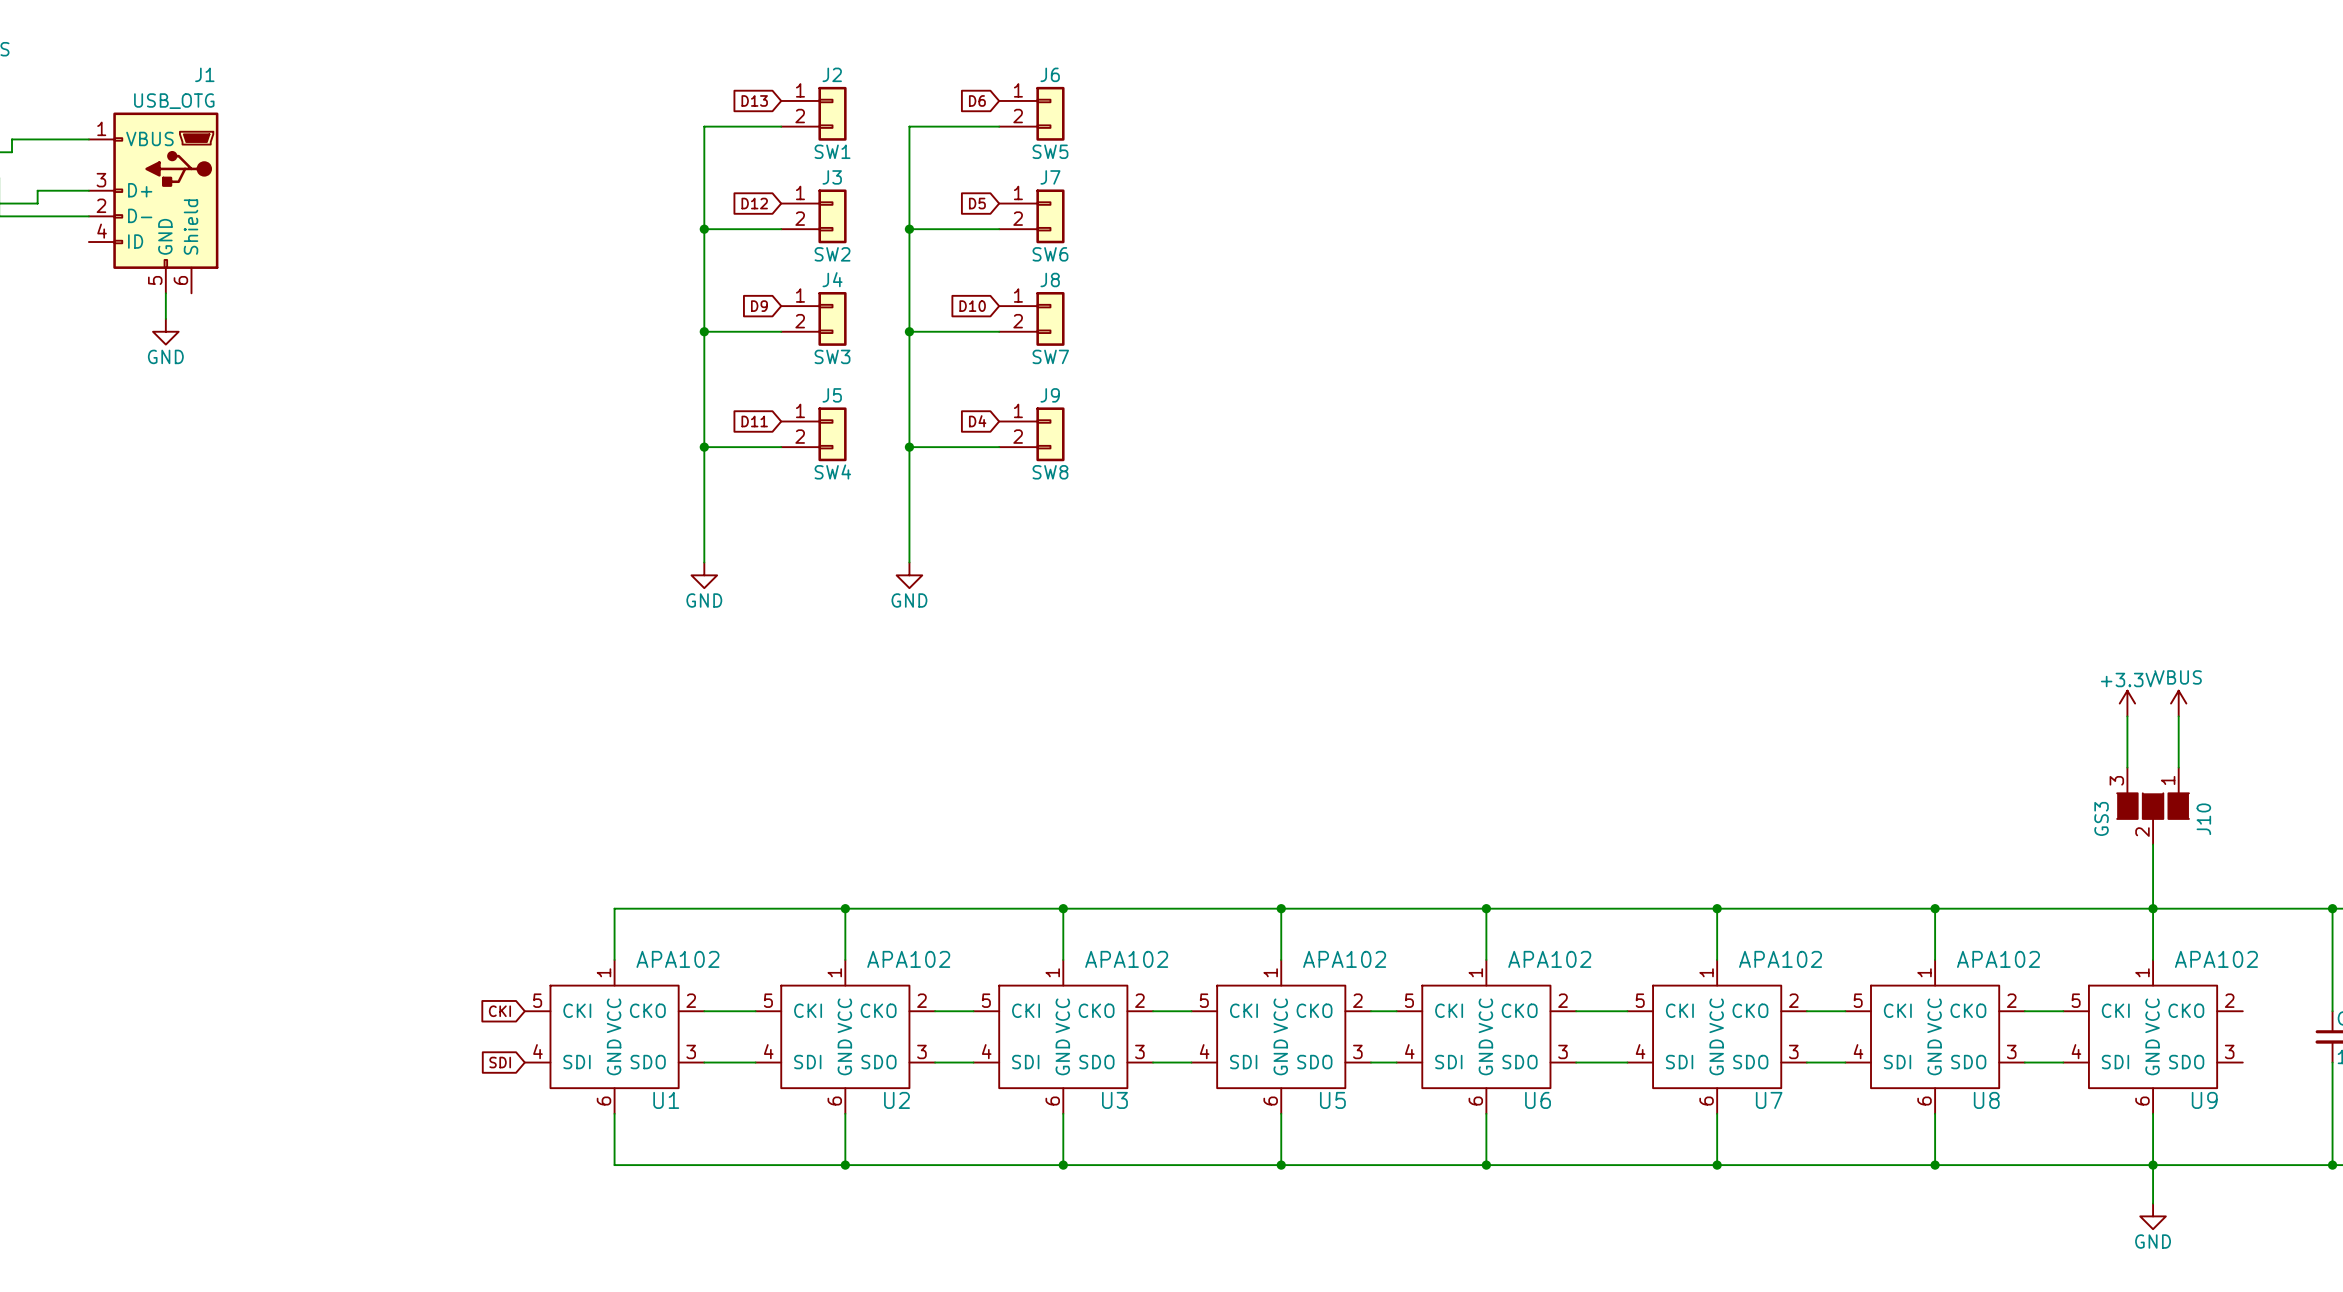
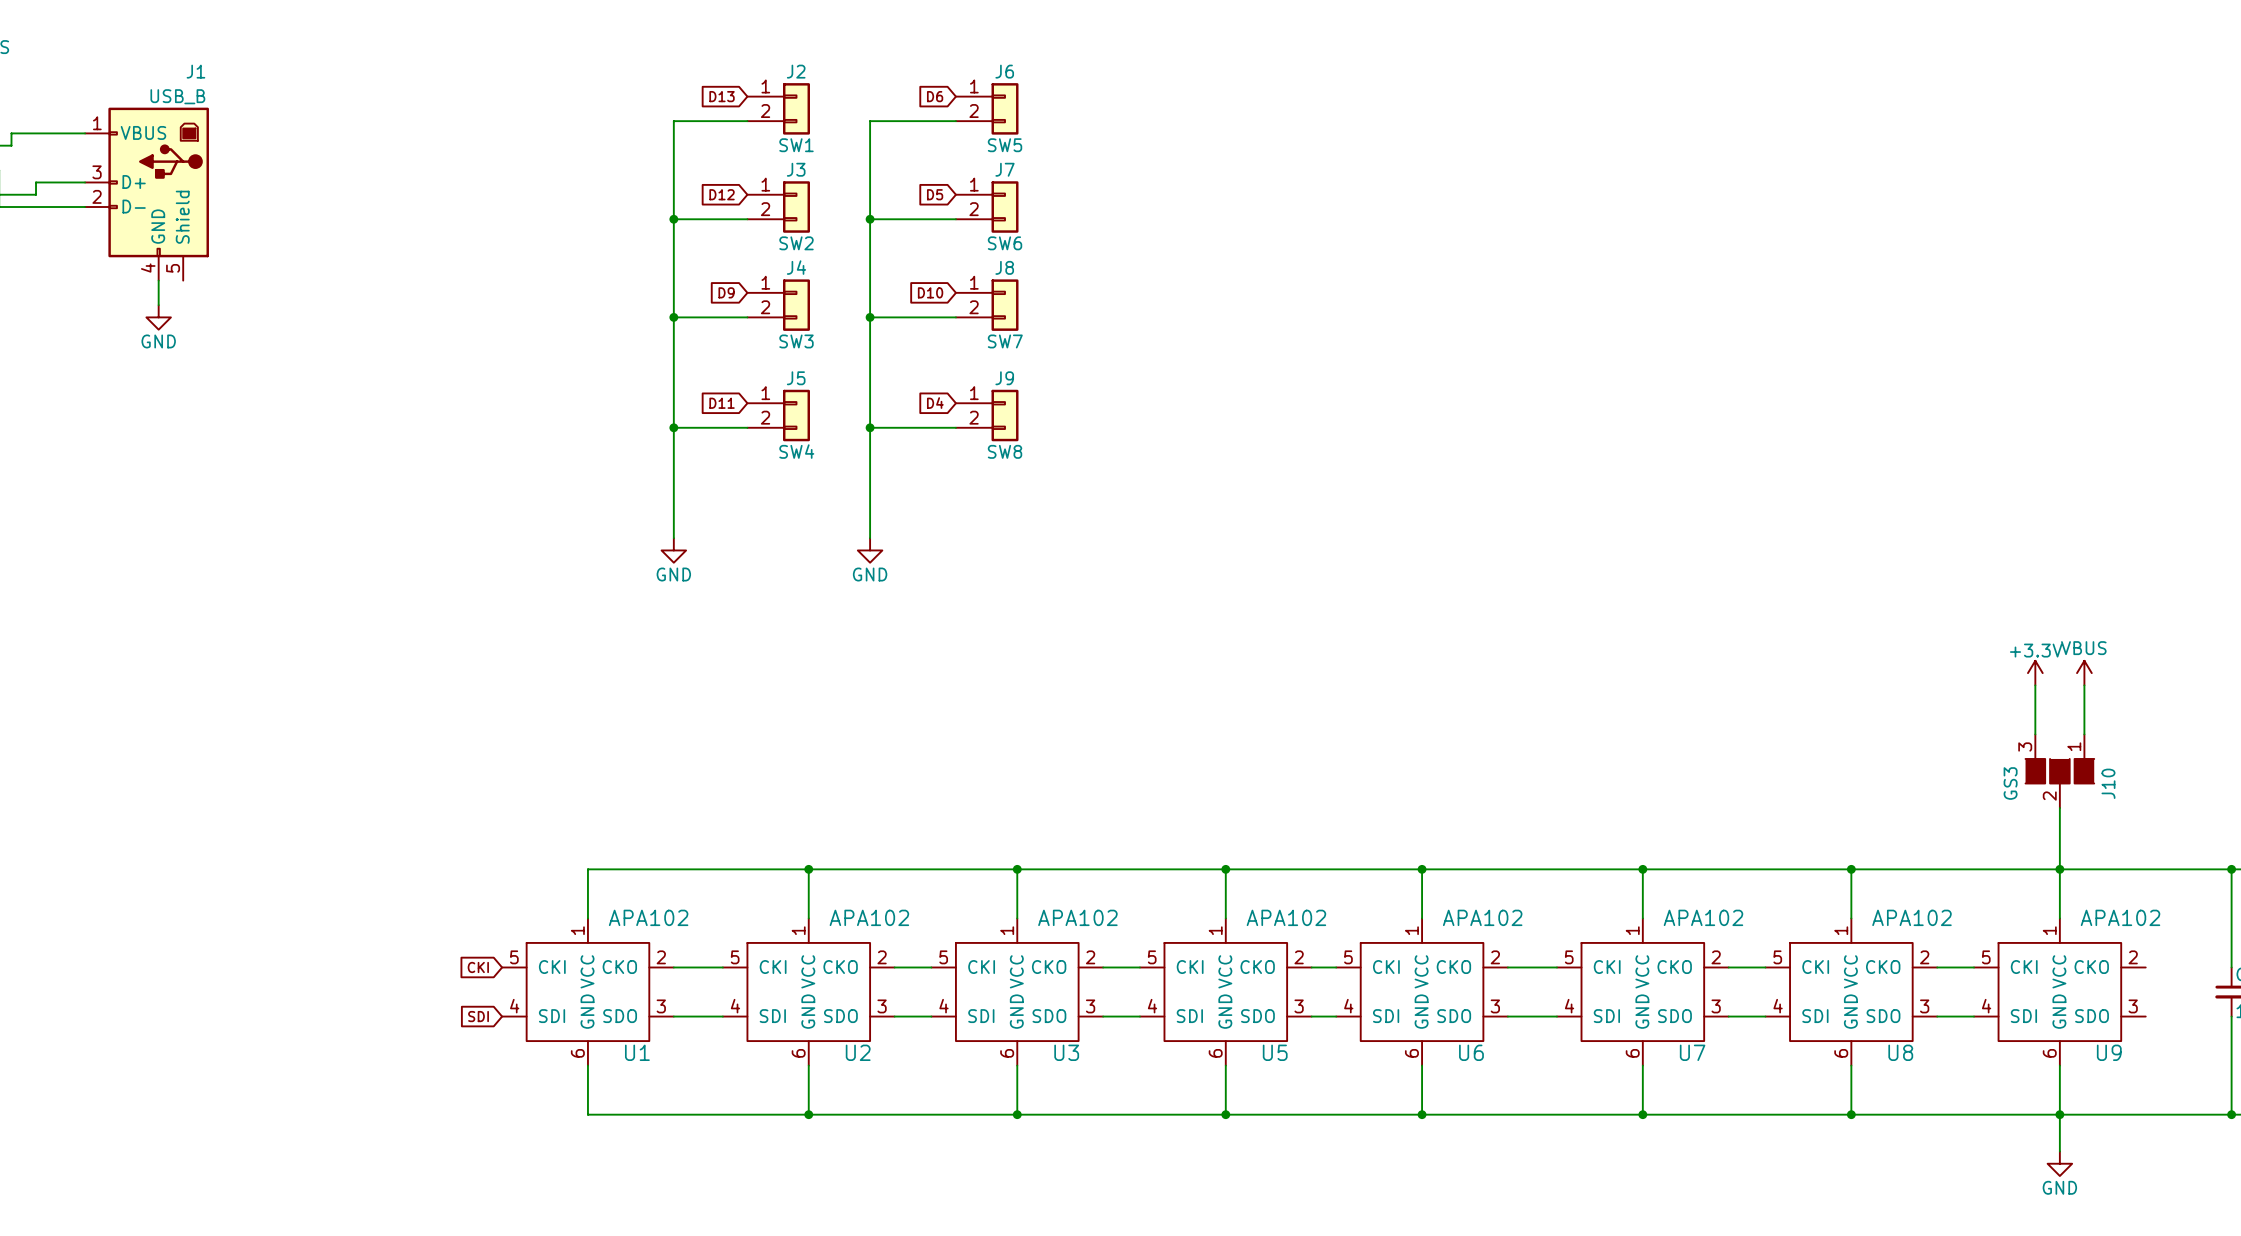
J1 value: USB_OTG (174, 101) -> USB_B (177, 96)
J1 symbol: [88, 112, 219, 294] -> [85, 107, 209, 281]

